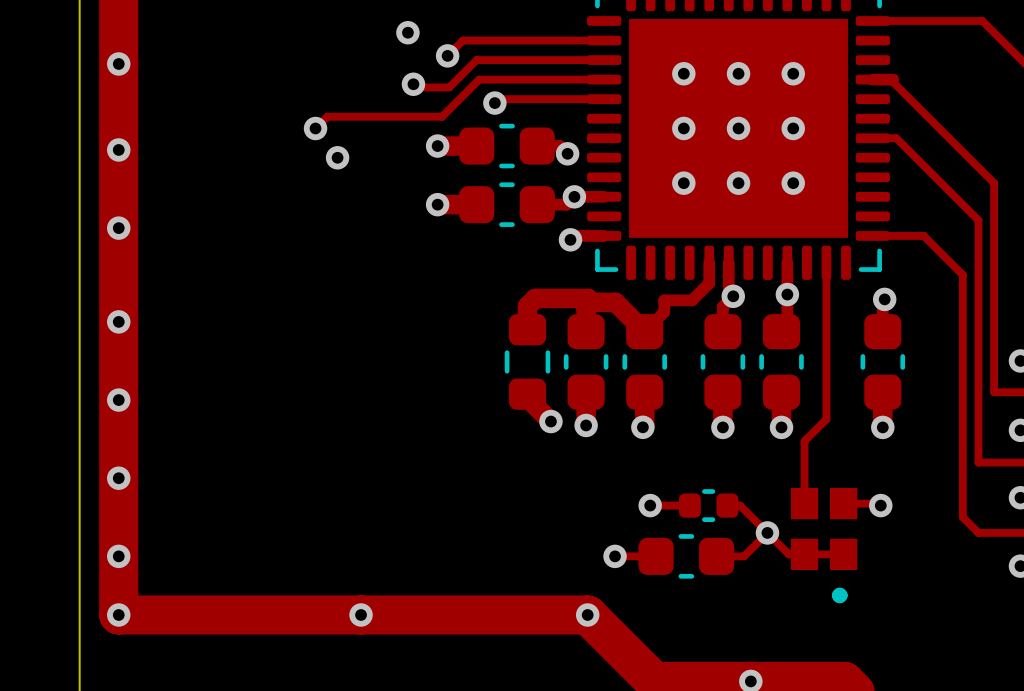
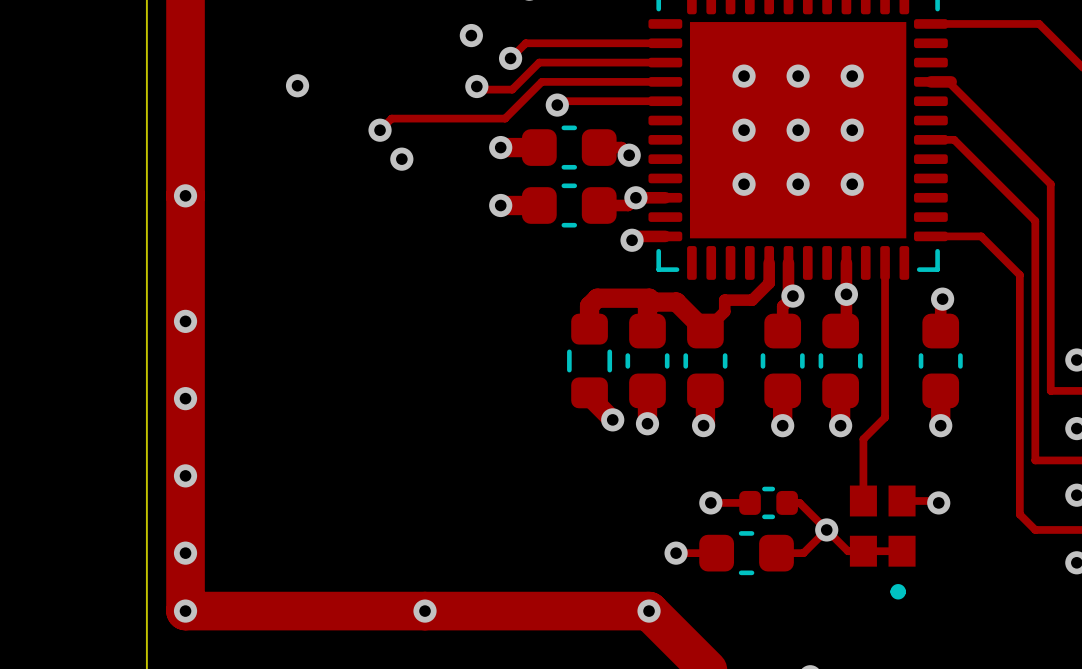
via: (118, 63) -> none
via: none -> (297, 85)
via: (118, 149) -> none
via: none -> (185, 195)
via: (118, 228) -> none

